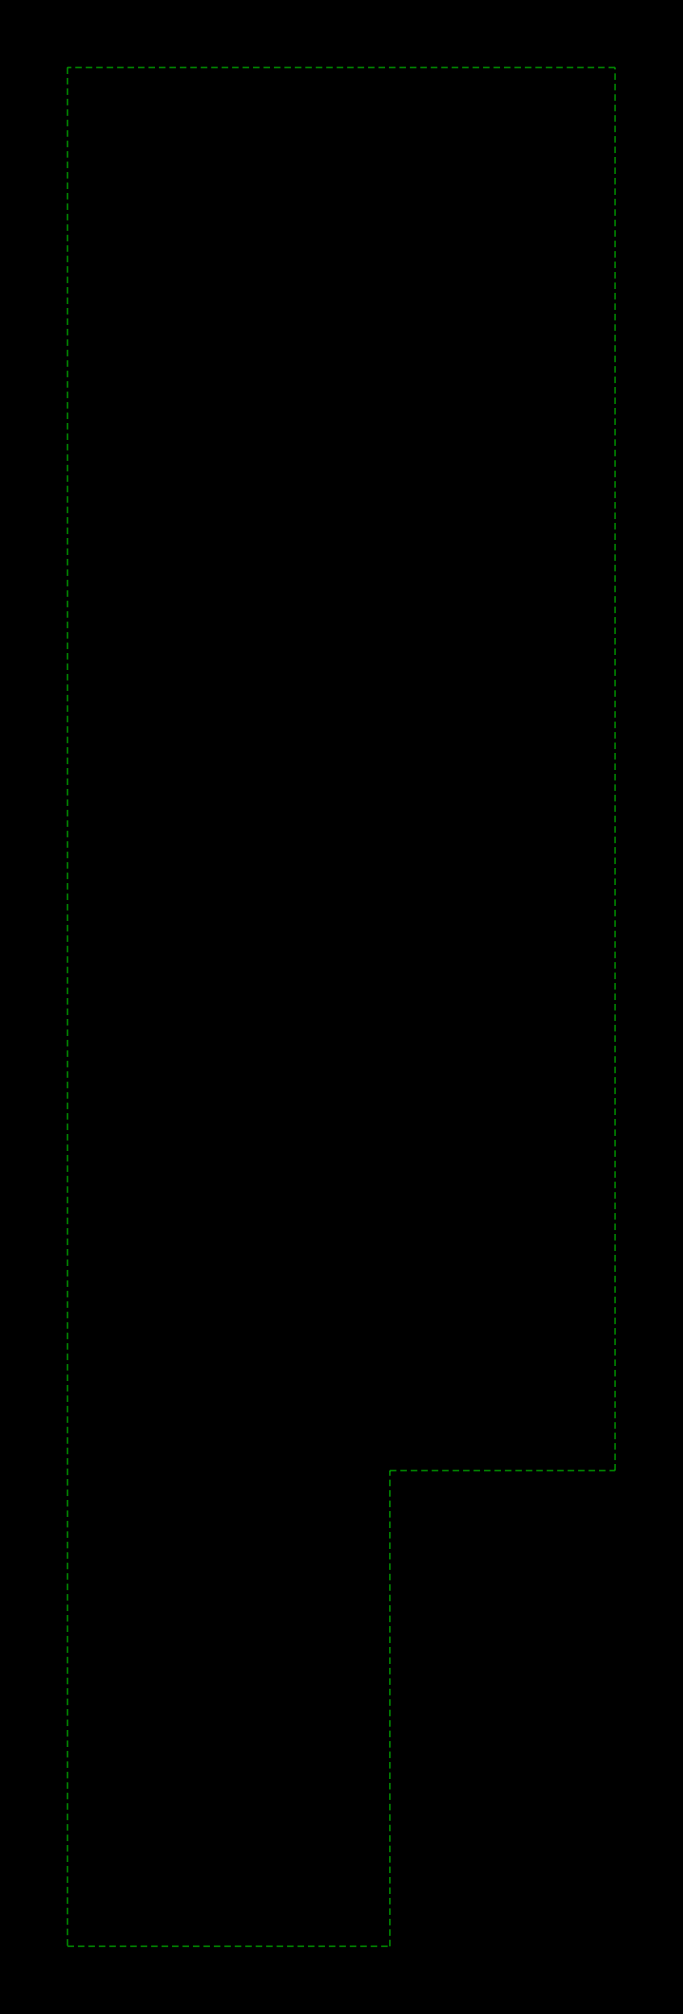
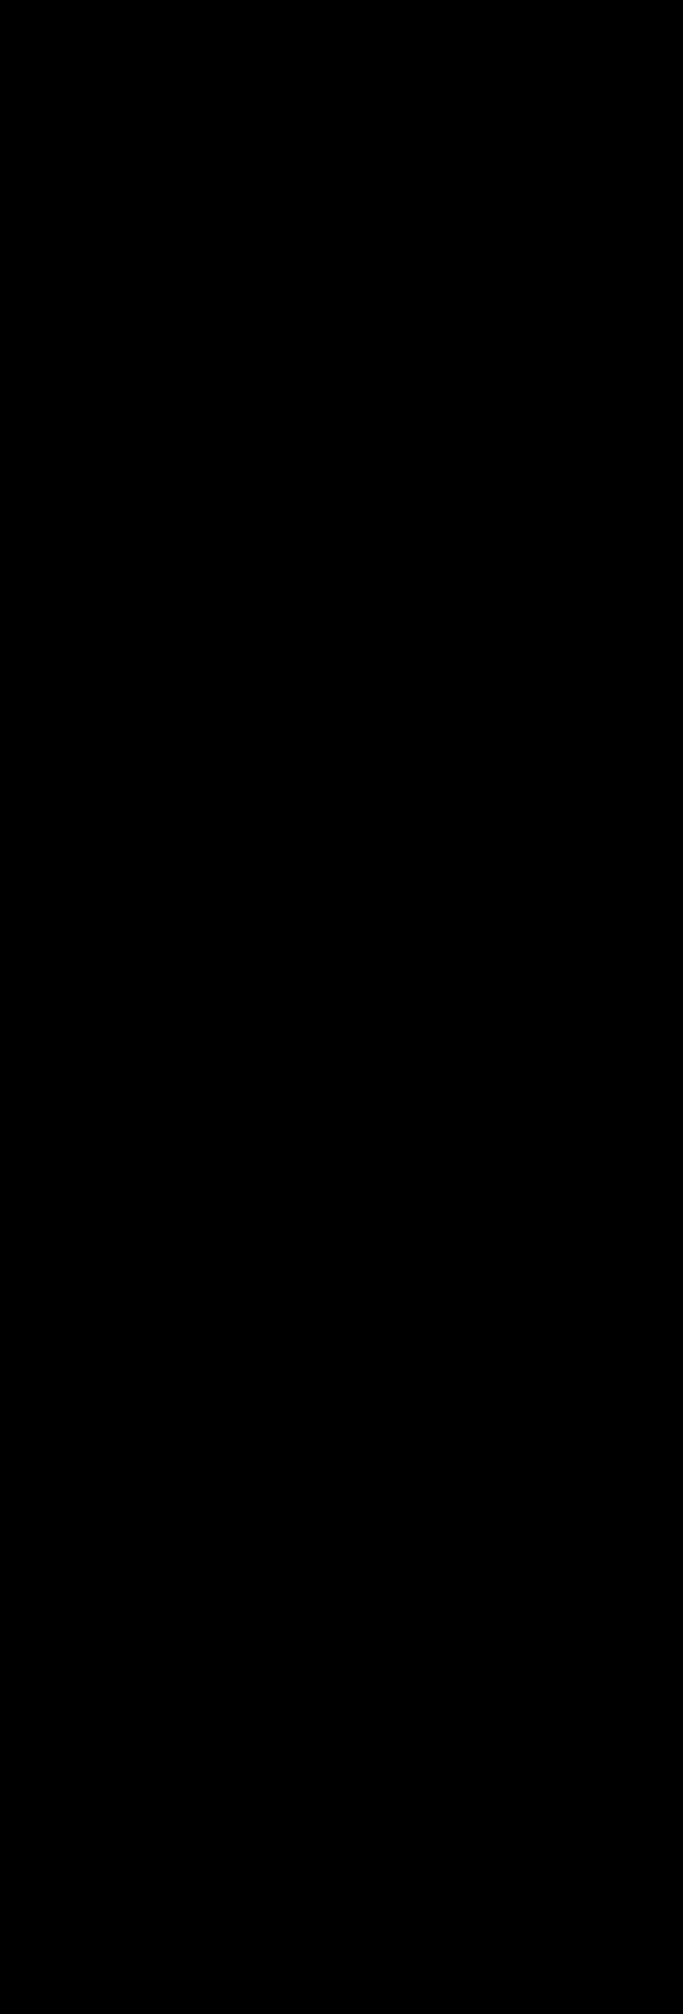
bottom zone outline: (67, 67) (615, 67) (615, 1470) (389, 1470) (389, 1946) (67, 1946) (67, 67) -> none

